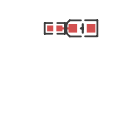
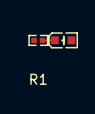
R1 name: none -> R1 (38, 79)

